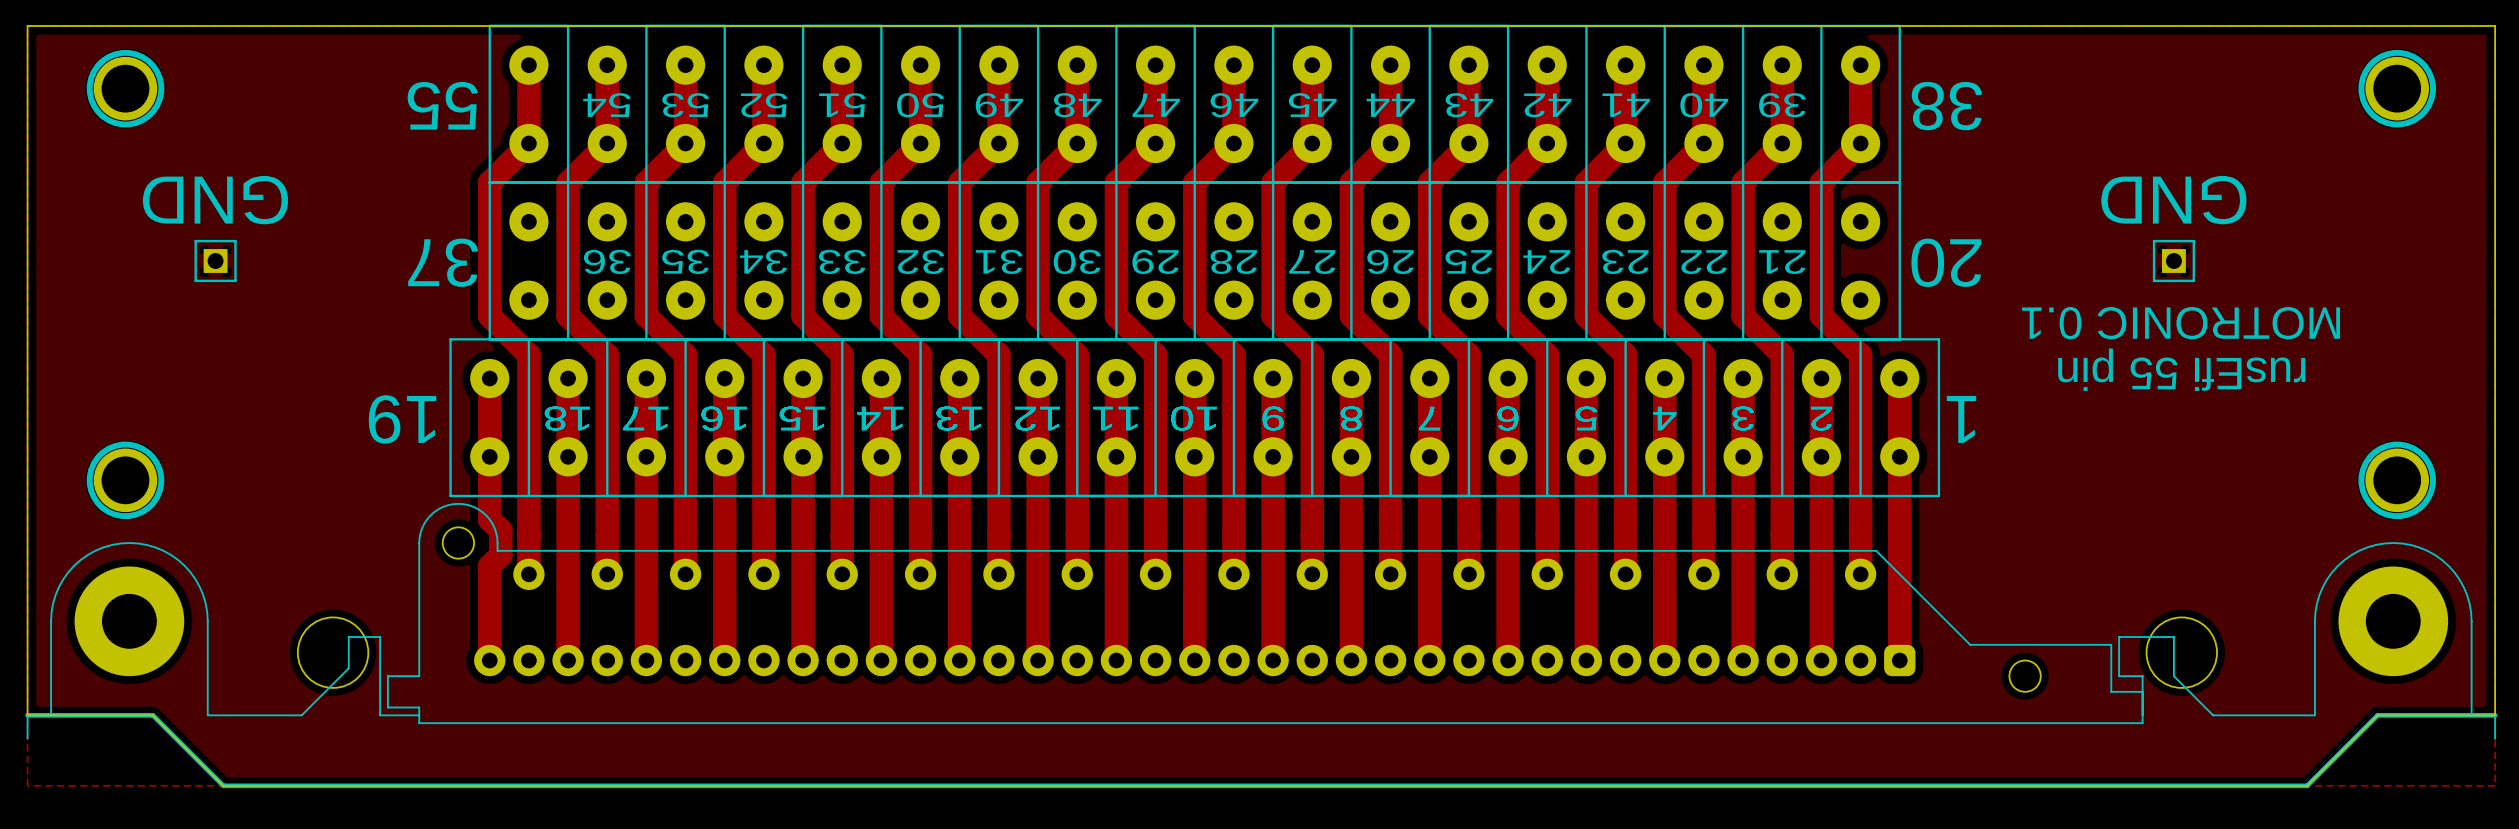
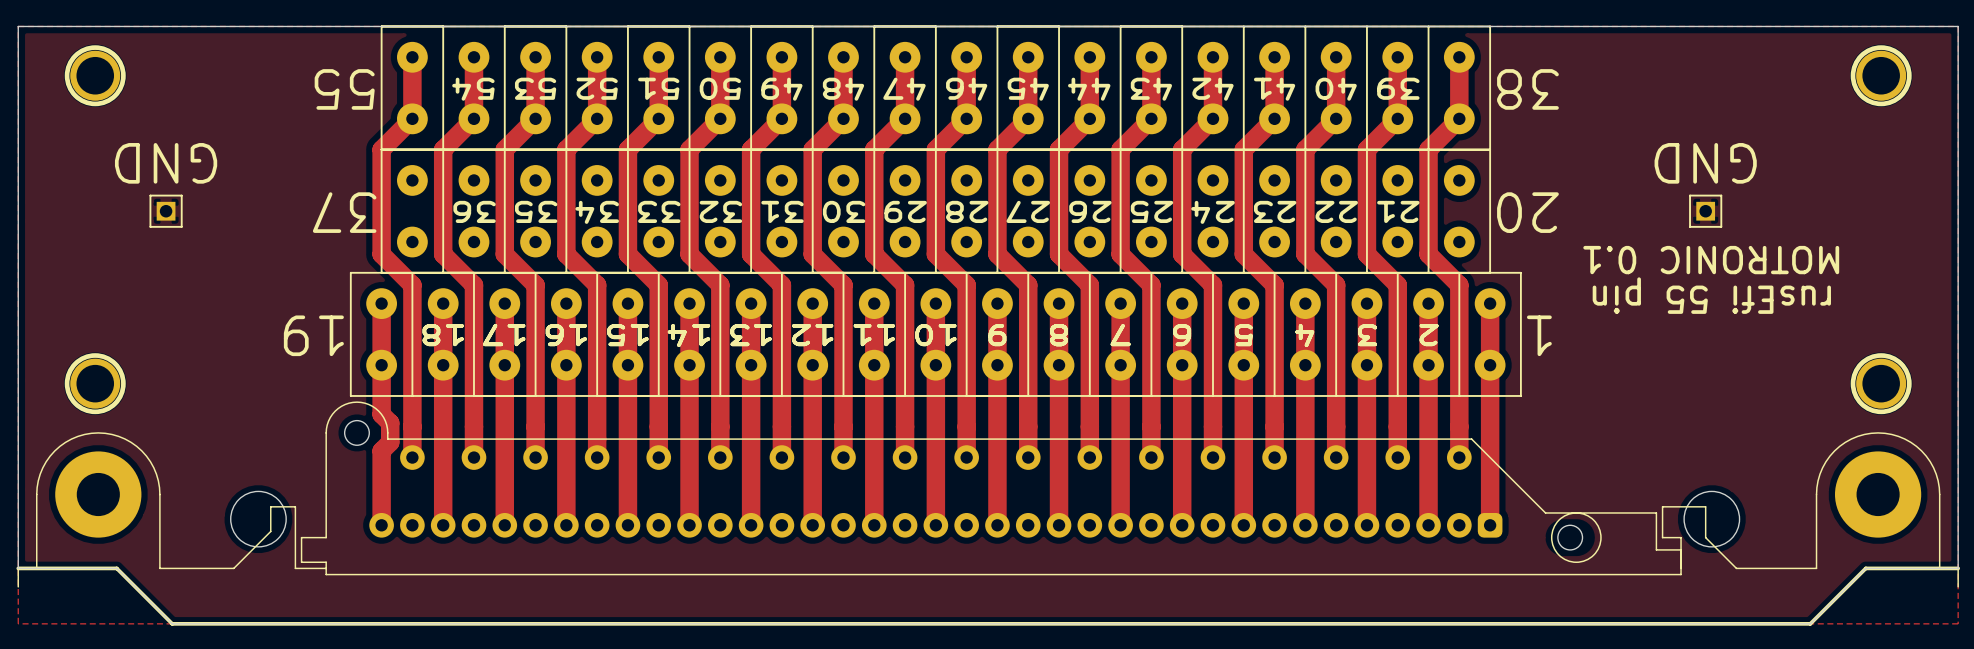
part footprint: [25, 502, 2498, 789] -> [16, 401, 1961, 626]

